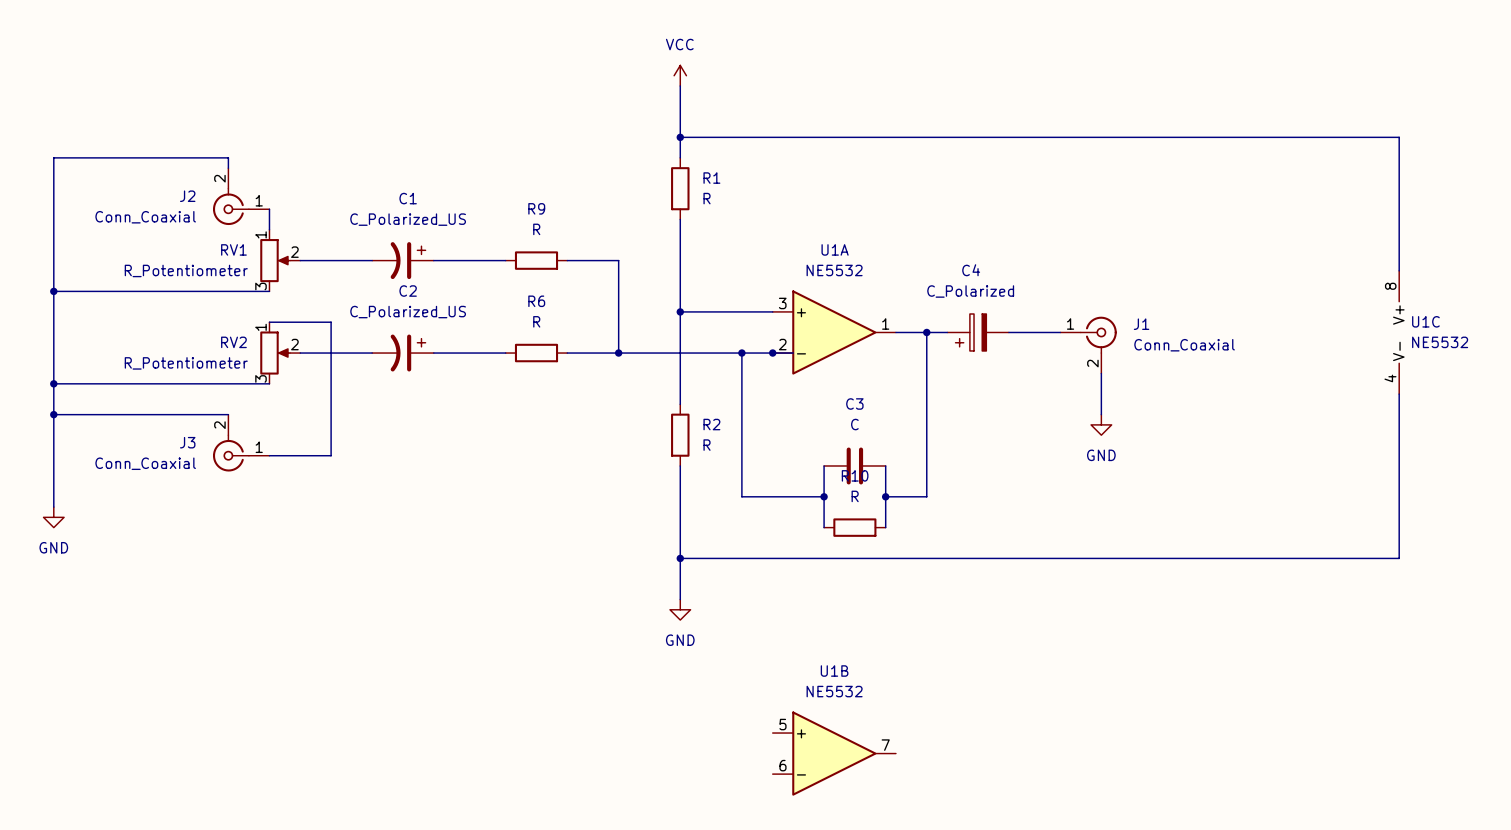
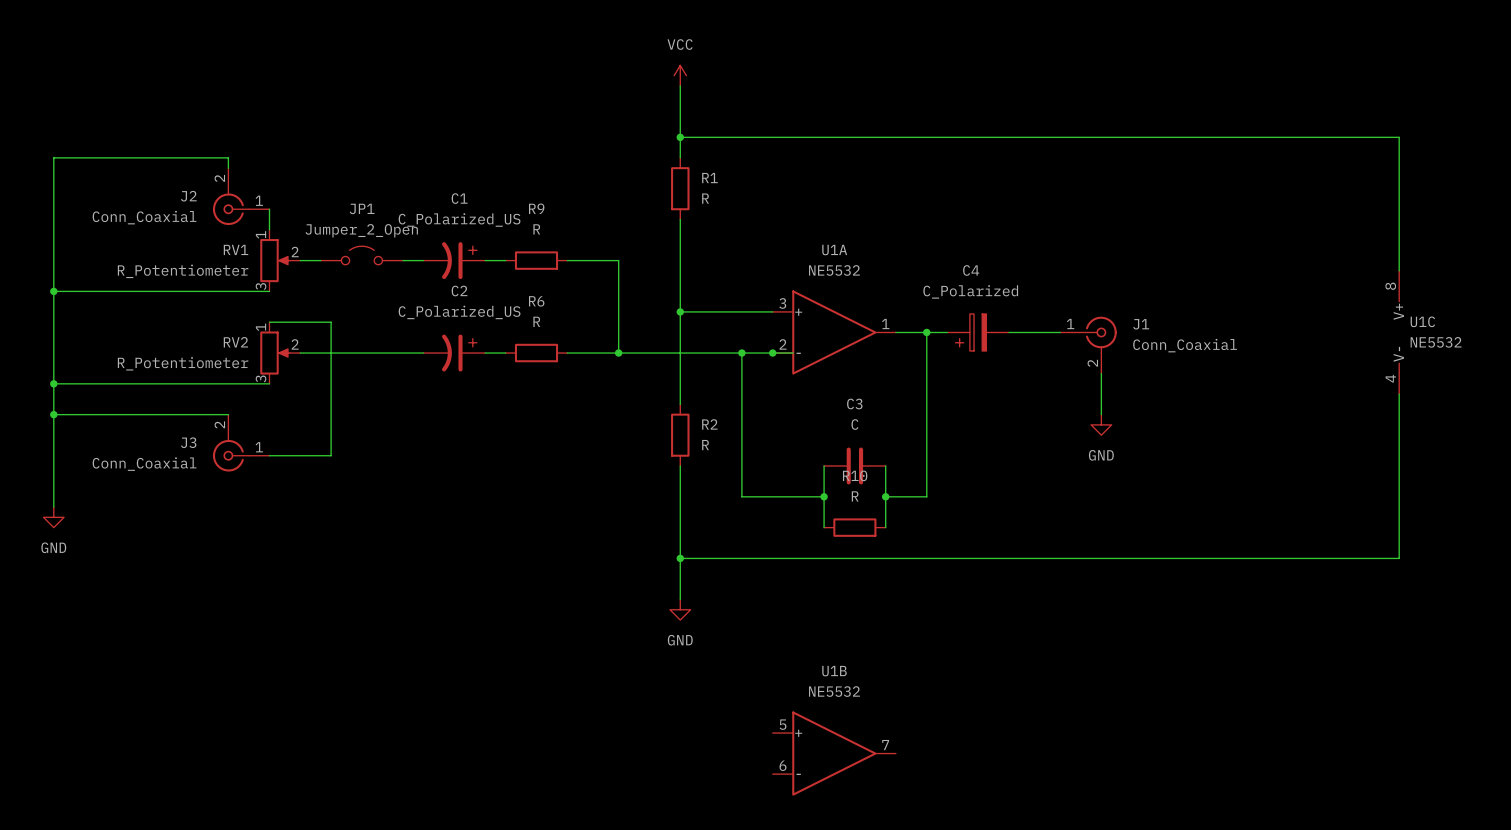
JP1: none -> Jumper_2_Open (361, 255)
wire: (320, 260) (372, 260) -> none
C1 position: (402, 260) -> (454, 260)
C2 position: (402, 353) -> (454, 353)

